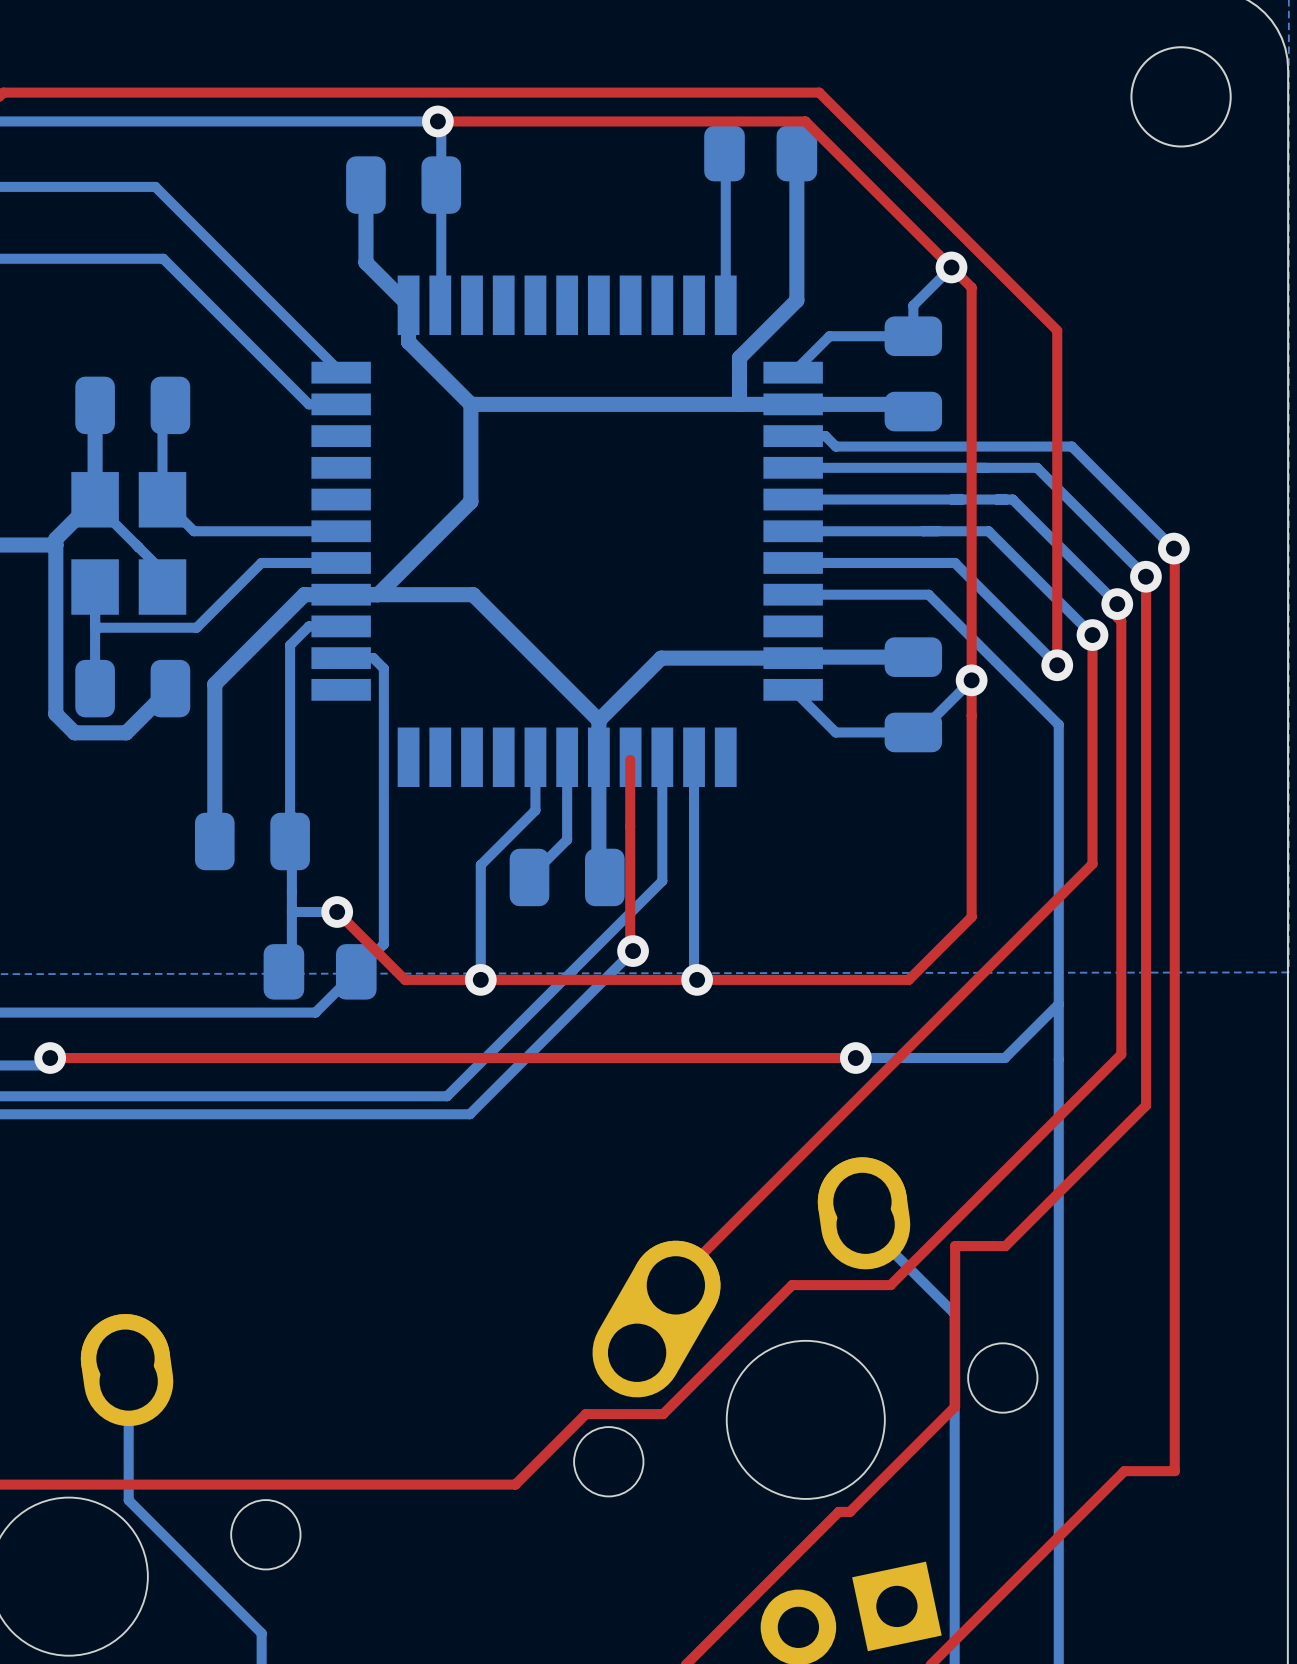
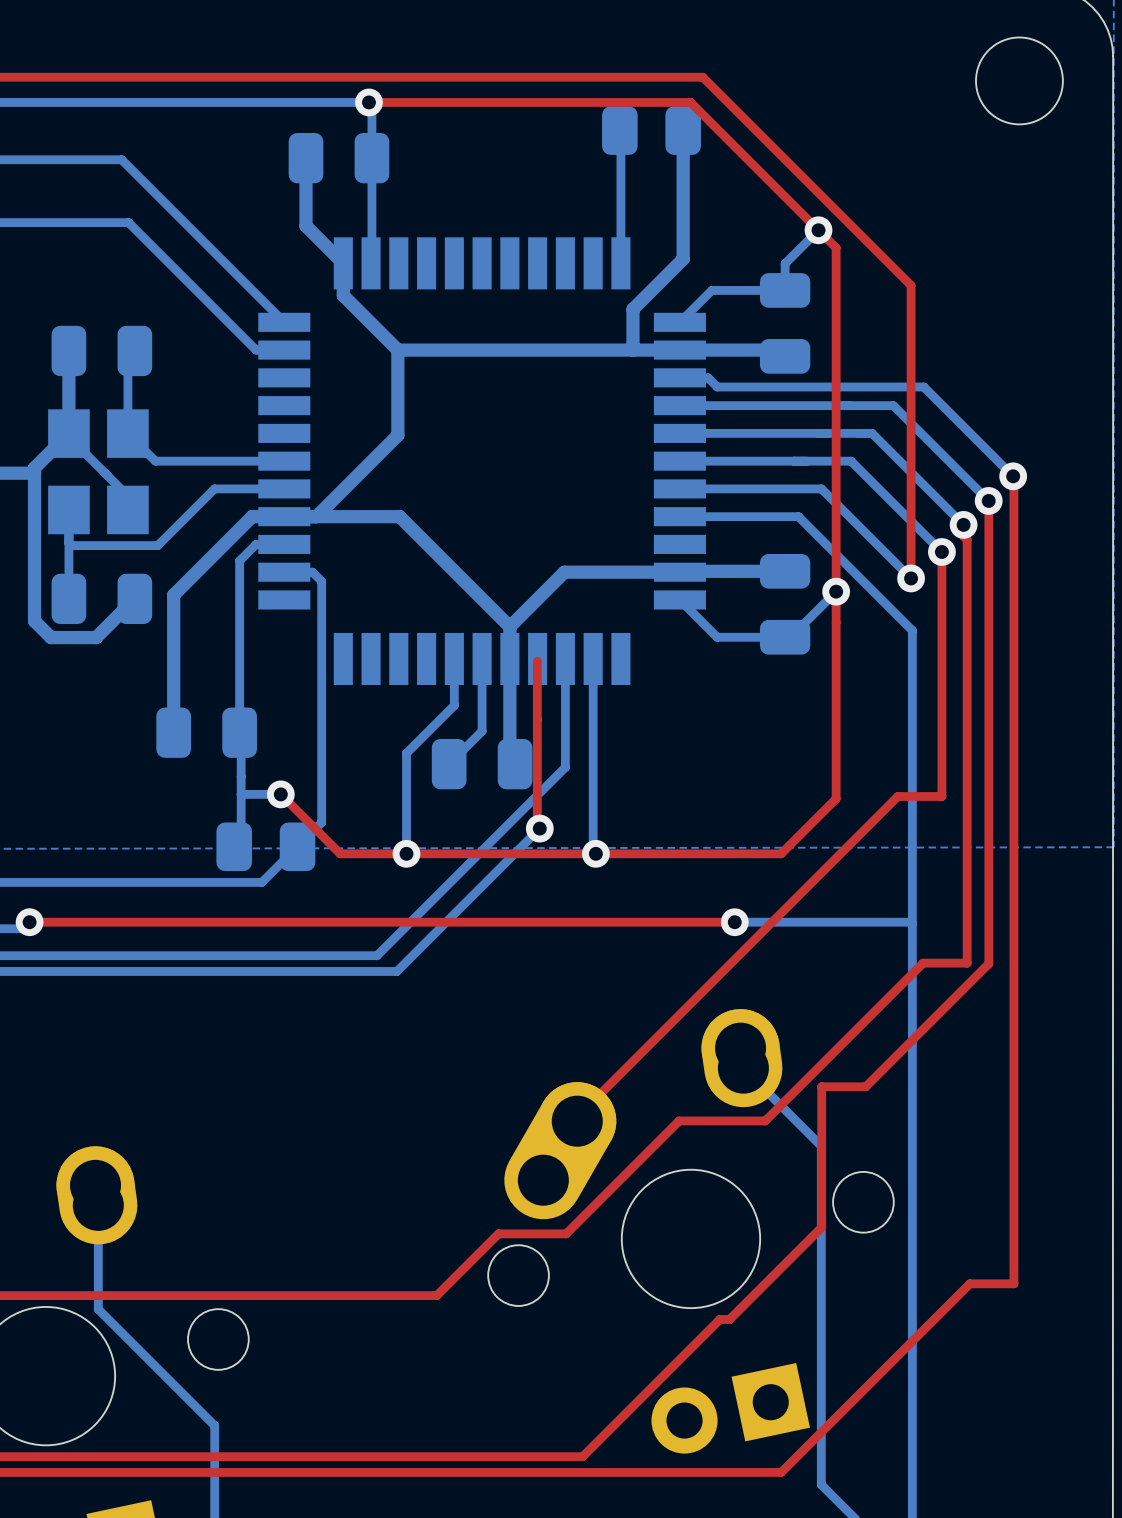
top track: (1092, 864) (1042, 914) -> (941, 752) (941, 796) (897, 796)
bottom track: (1058, 1004) (1004, 1058) -> (912, 923) (865, 922)
top track: (1121, 1054) (1070, 1104) -> (967, 919) (967, 963) (923, 963)

